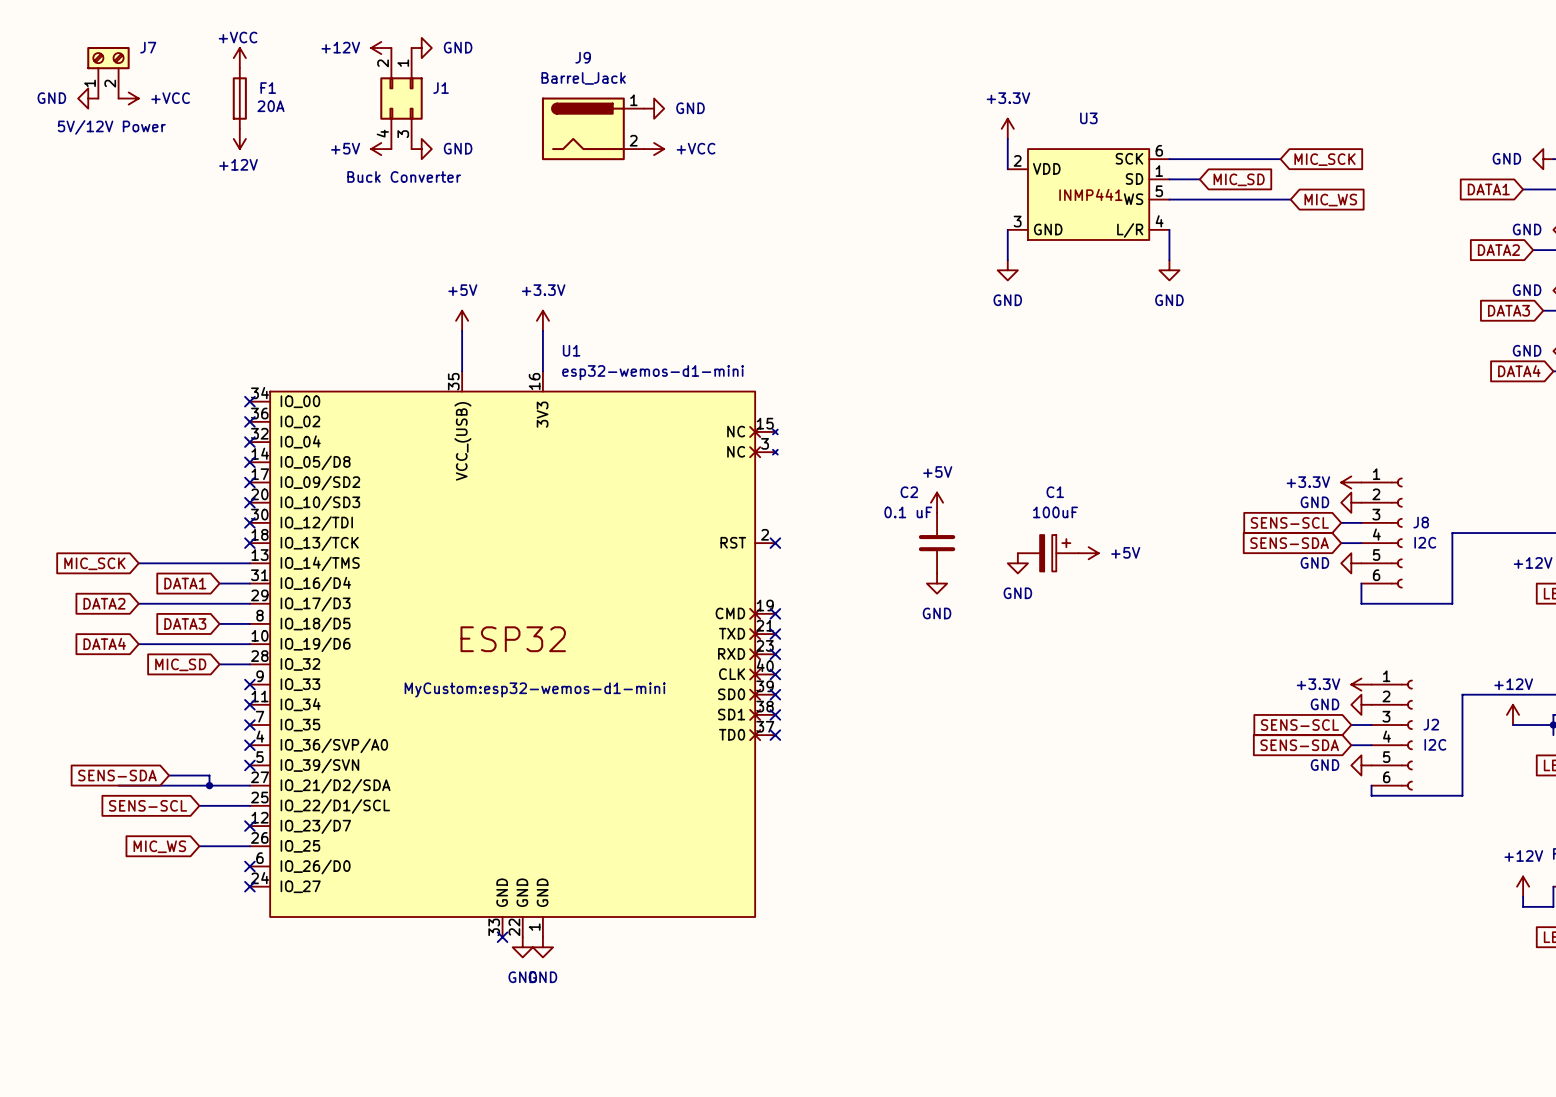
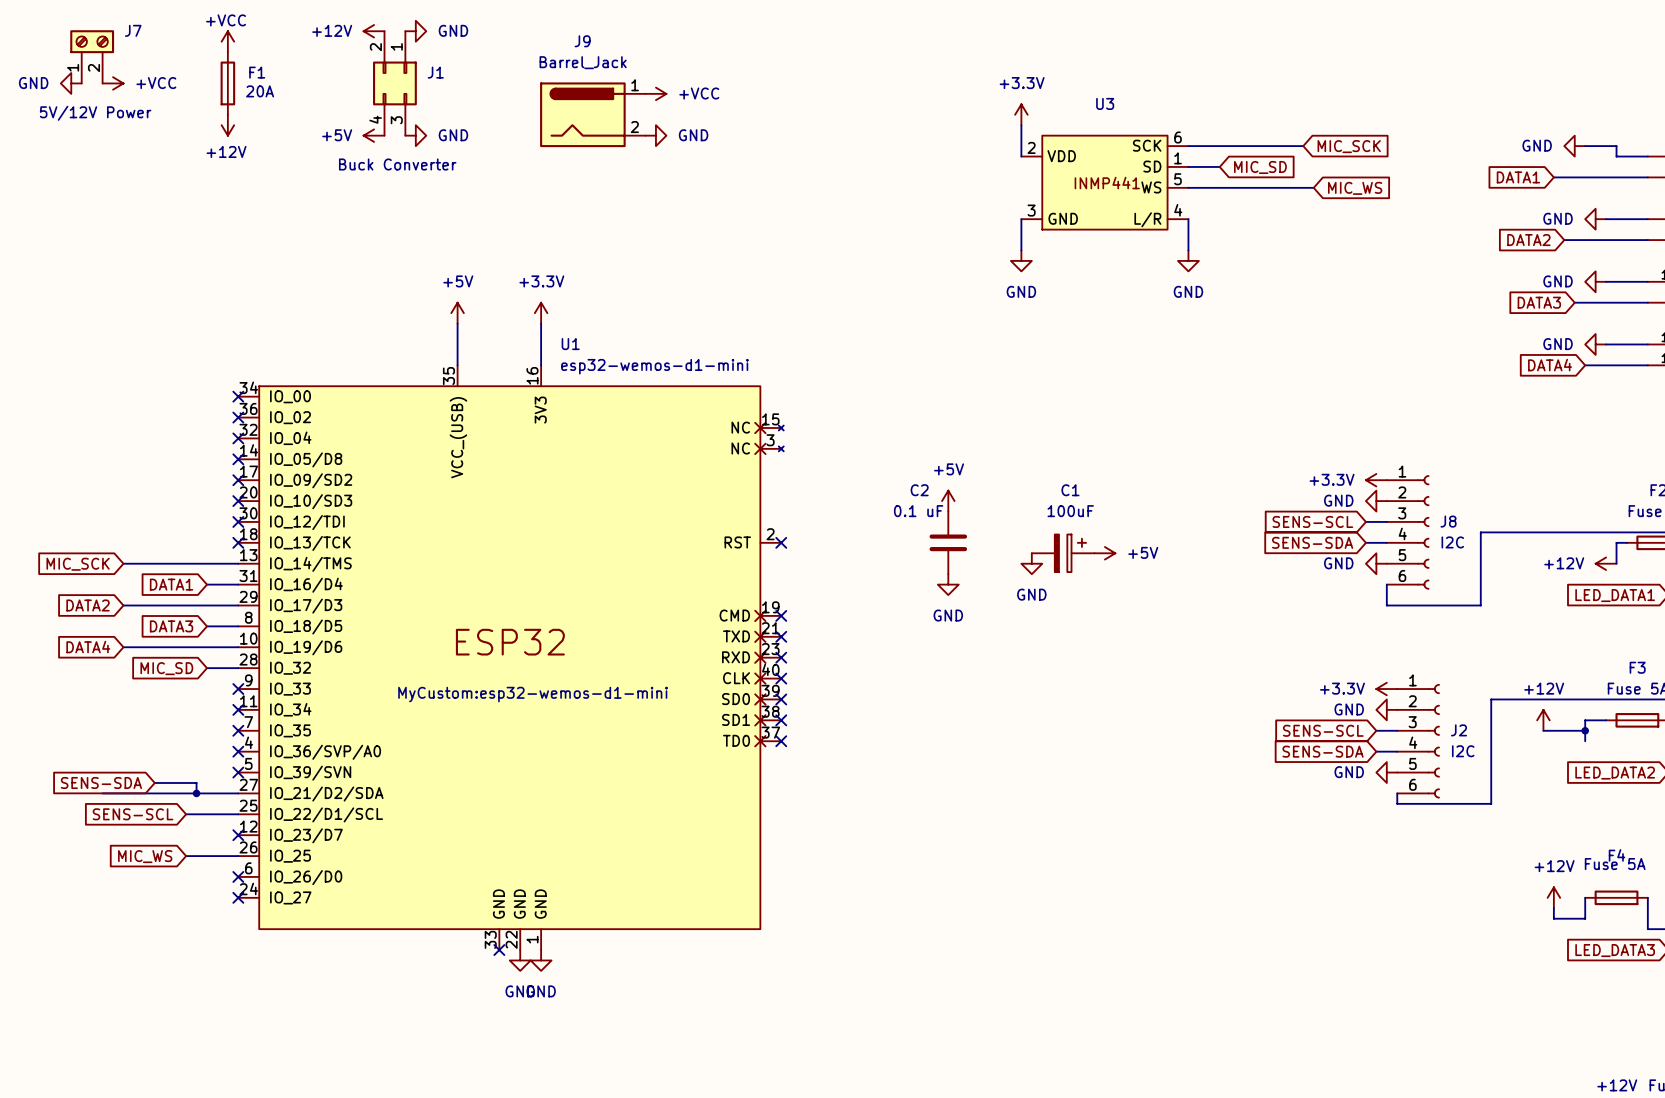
power symbol: GND (654, 108) -> +VCC (655, 93)
power symbol: +VCC (654, 149) -> GND (655, 135)

